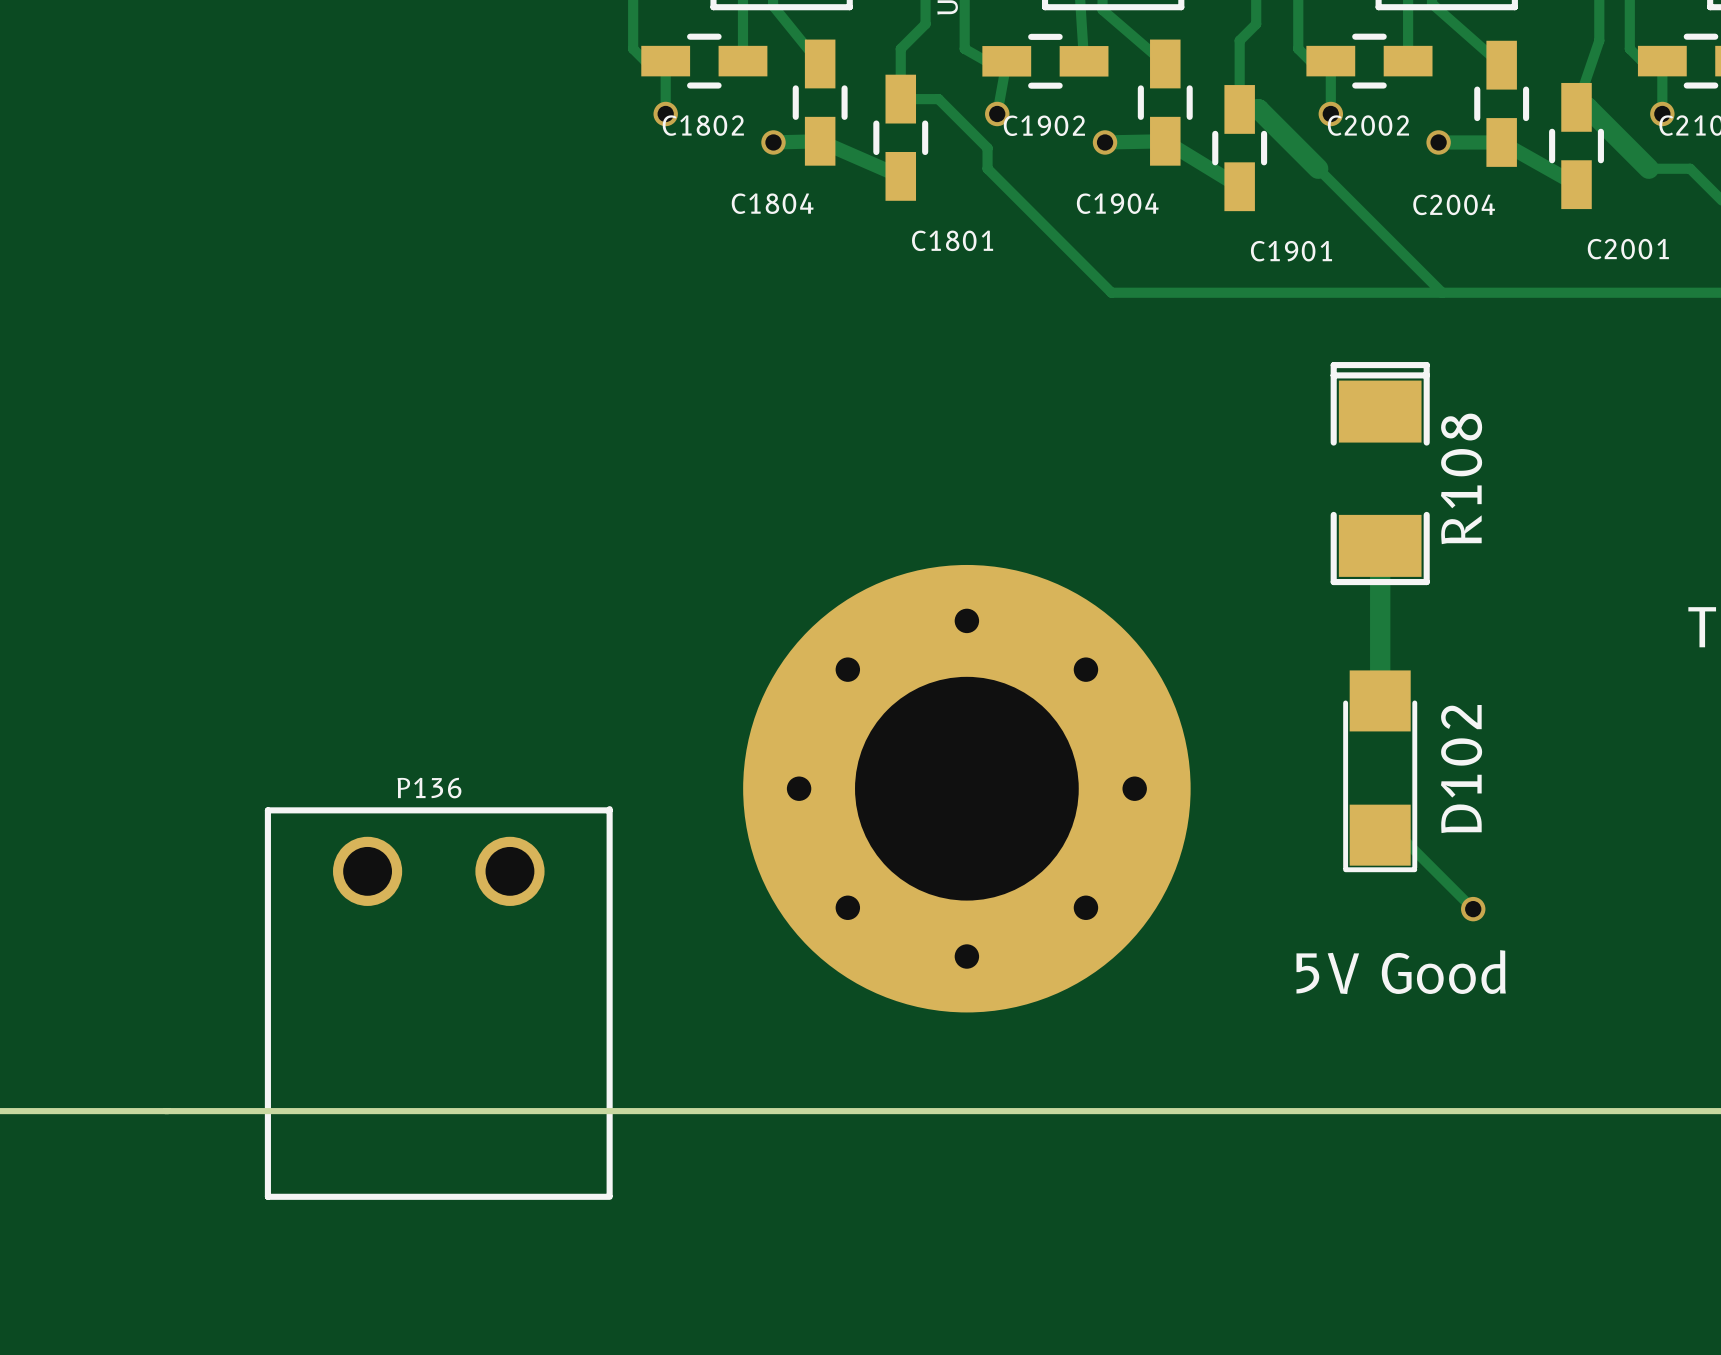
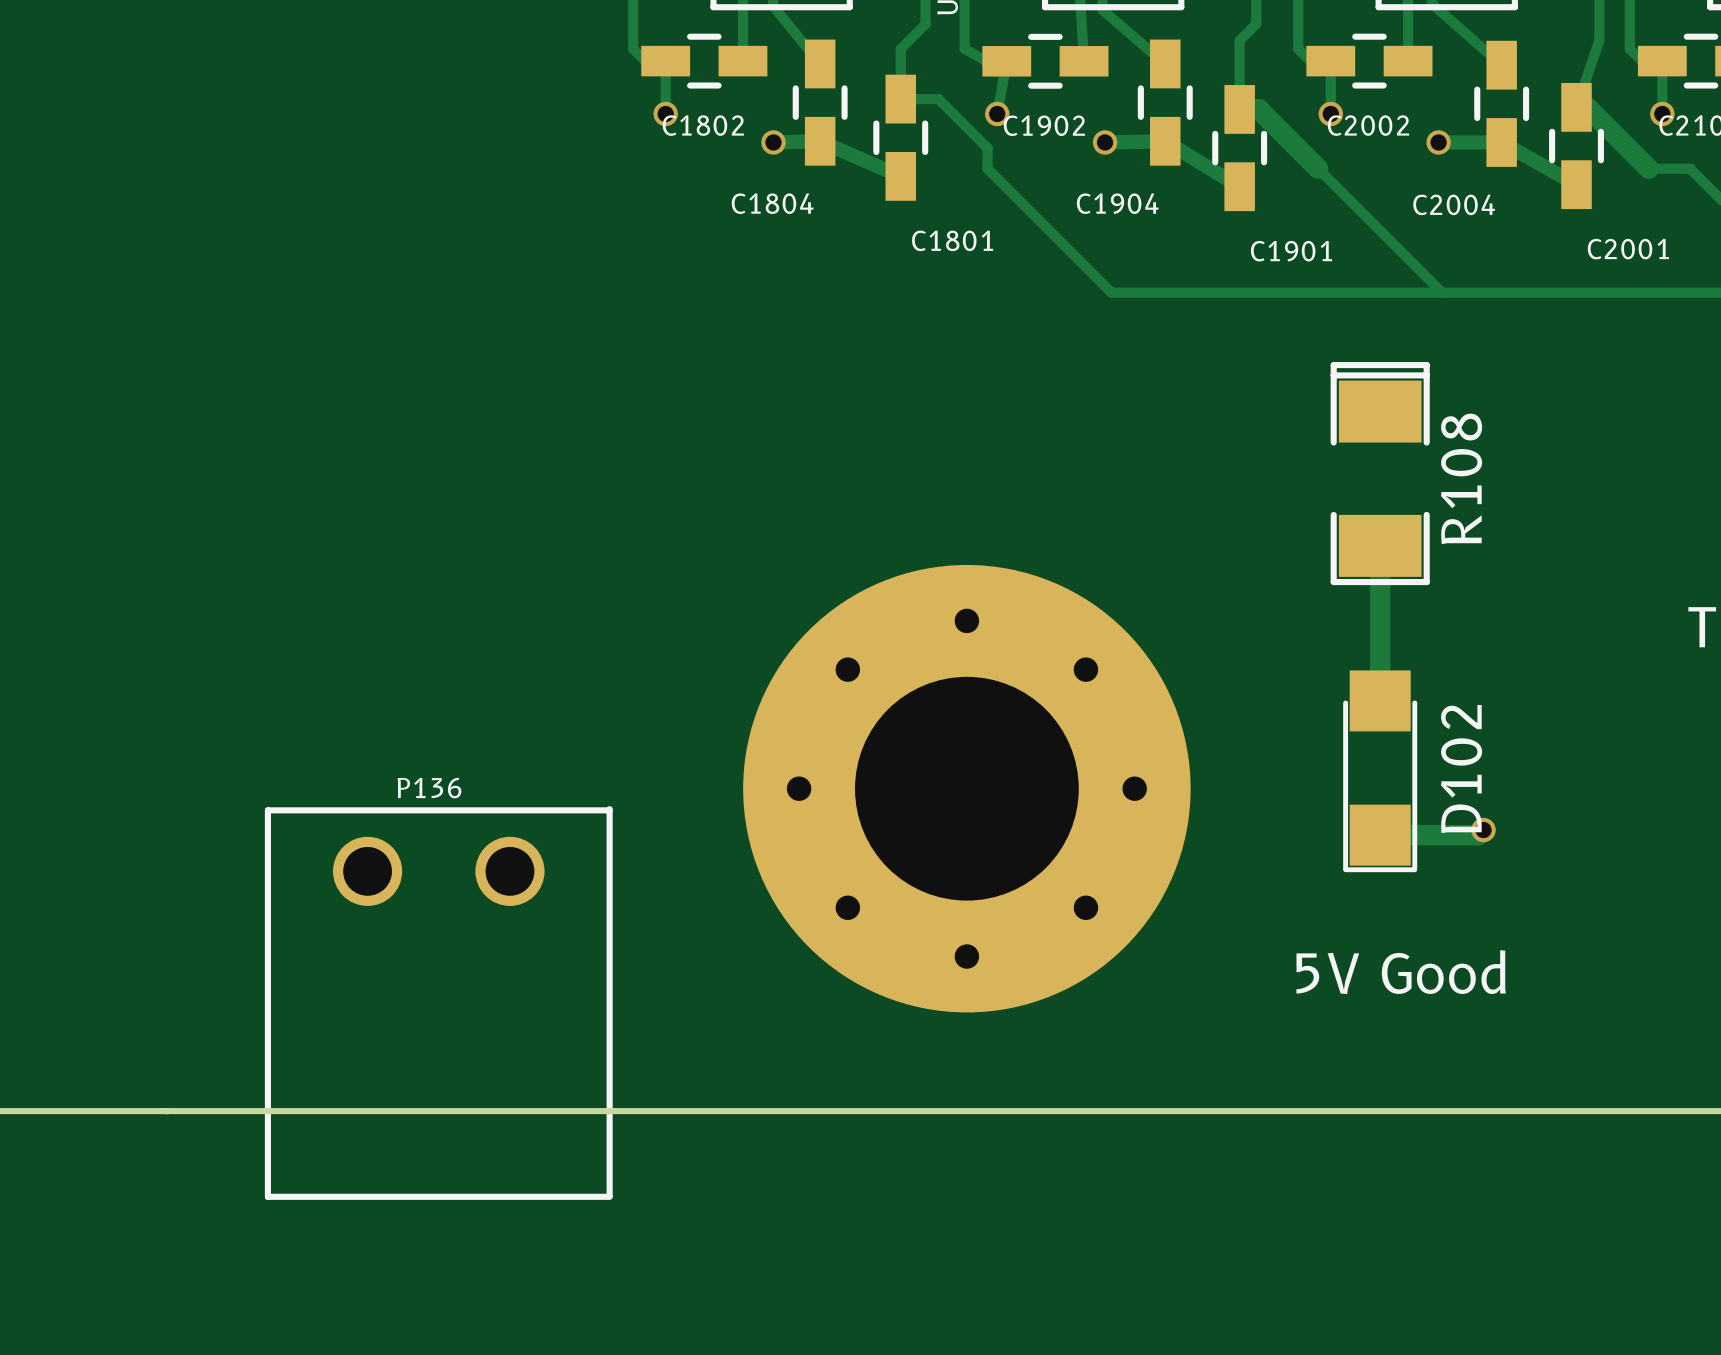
track: (1399, 835) (1473, 909) -> (1399, 835) (1478, 835) (1483, 830)
via position: (1473, 909) -> (1483, 830)

